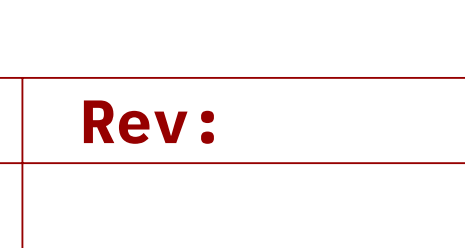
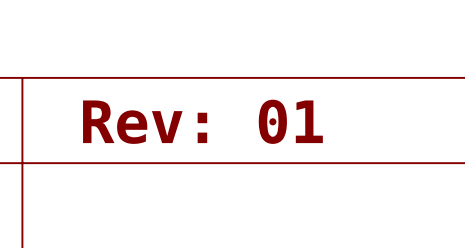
title block: Rev: (148, 122) -> Rev: 01 (202, 121)

